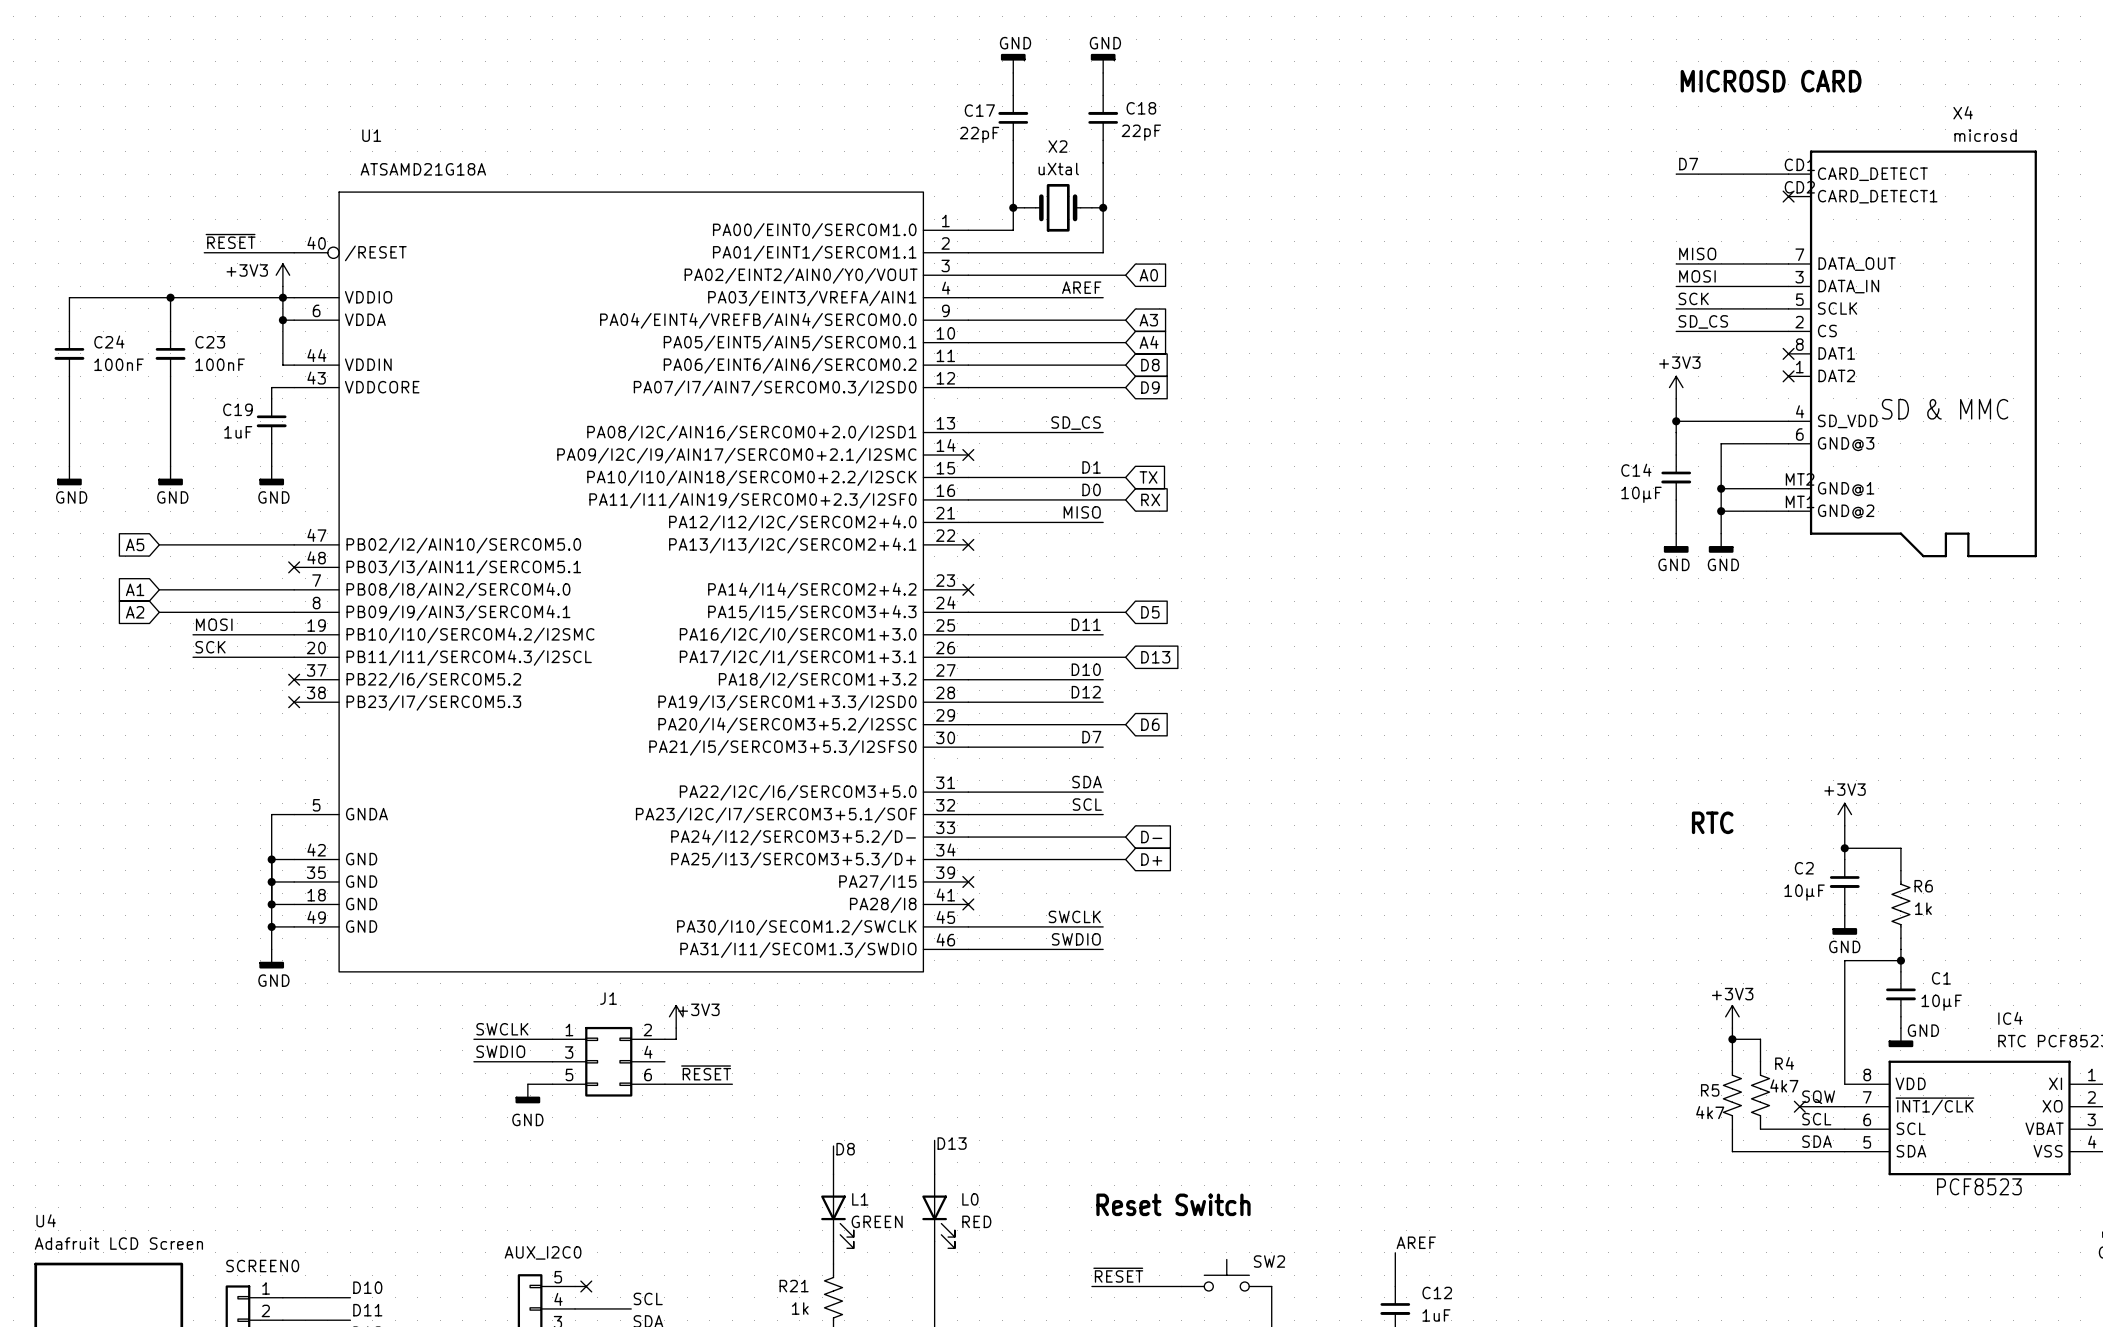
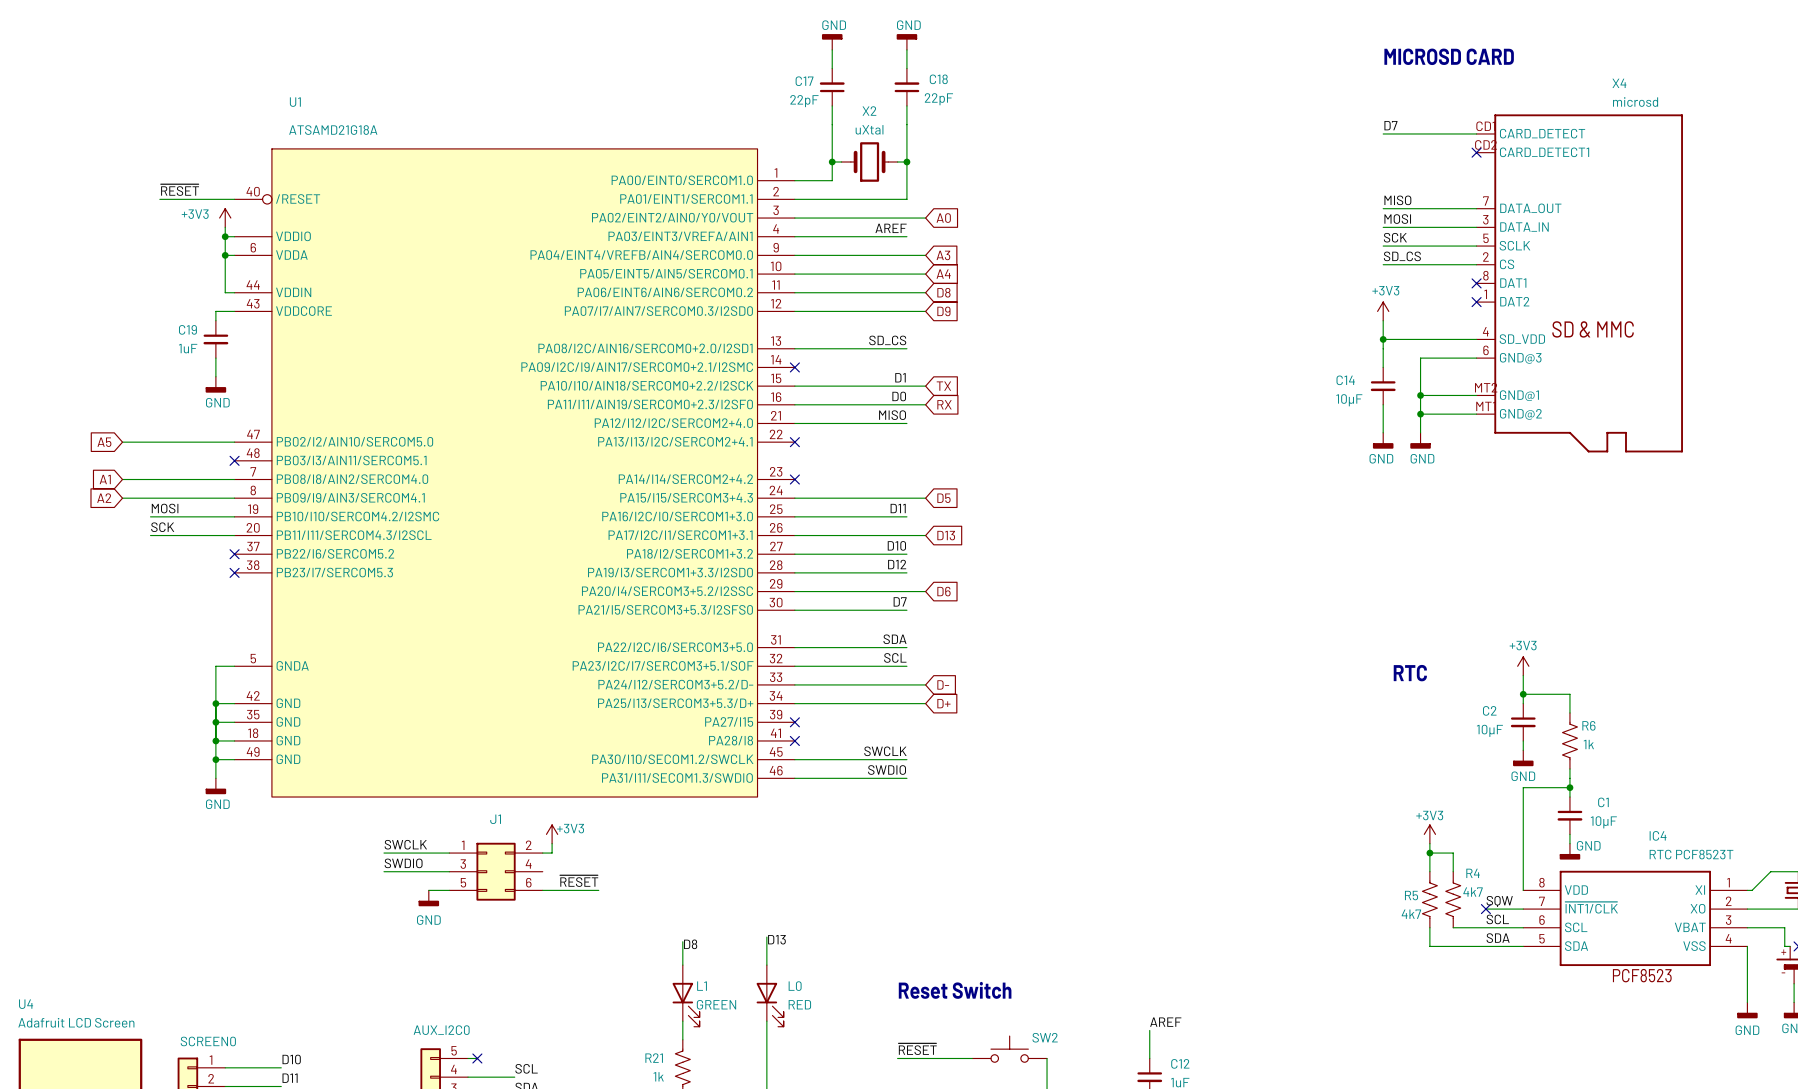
wire: (170, 297) (170, 331) -> none
junction: (170, 297) -> none
wire: (282, 297) (69, 297) (69, 331) -> none
C24: 100nF (69, 353) -> none
C23: 100nF (170, 353) -> none
wire: (69, 376) (69, 466) -> none
wire: (170, 376) (170, 466) -> none
power symbol: GND (69, 475) -> none
power symbol: GND (170, 475) -> none

